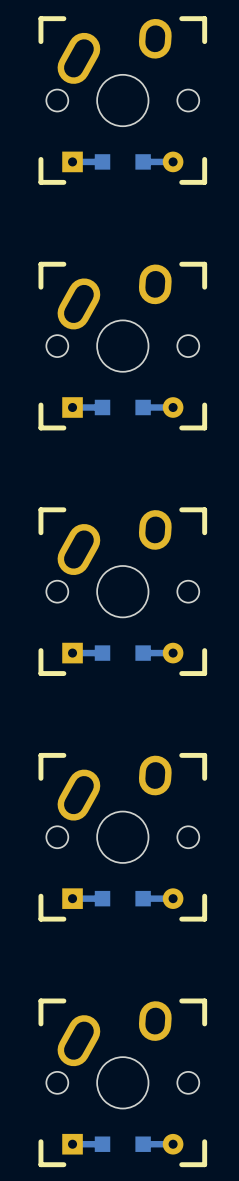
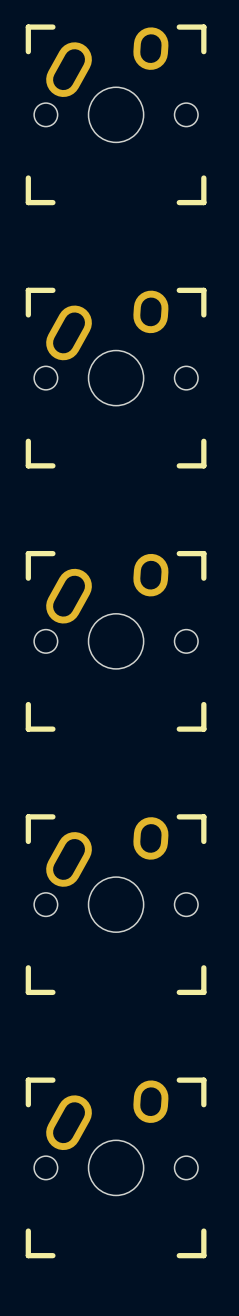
part: (122, 161) -> none
part: (122, 407) -> none
part: (122, 653) -> none
part: (122, 898) -> none
part: (122, 1144) -> none

